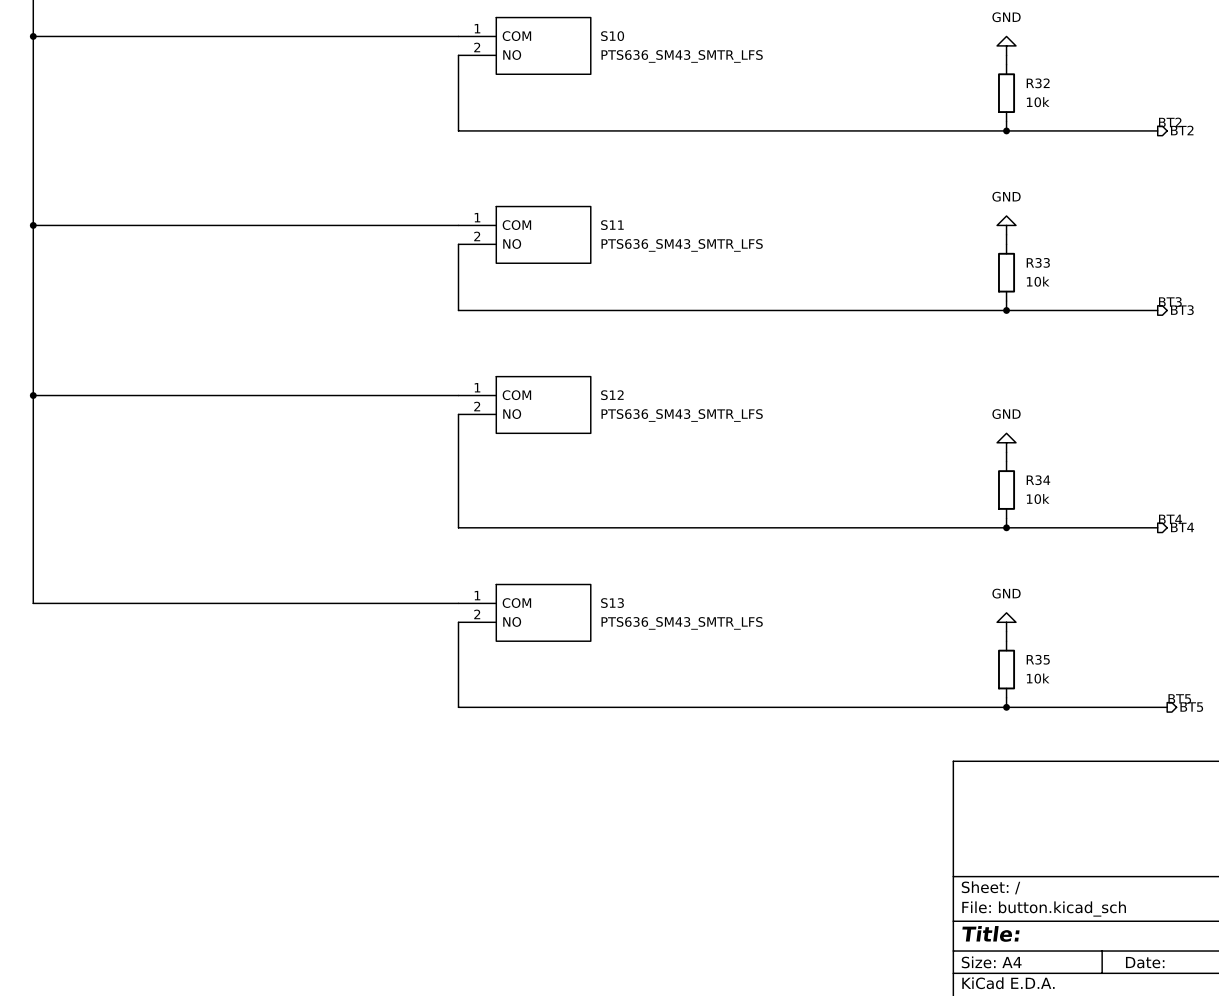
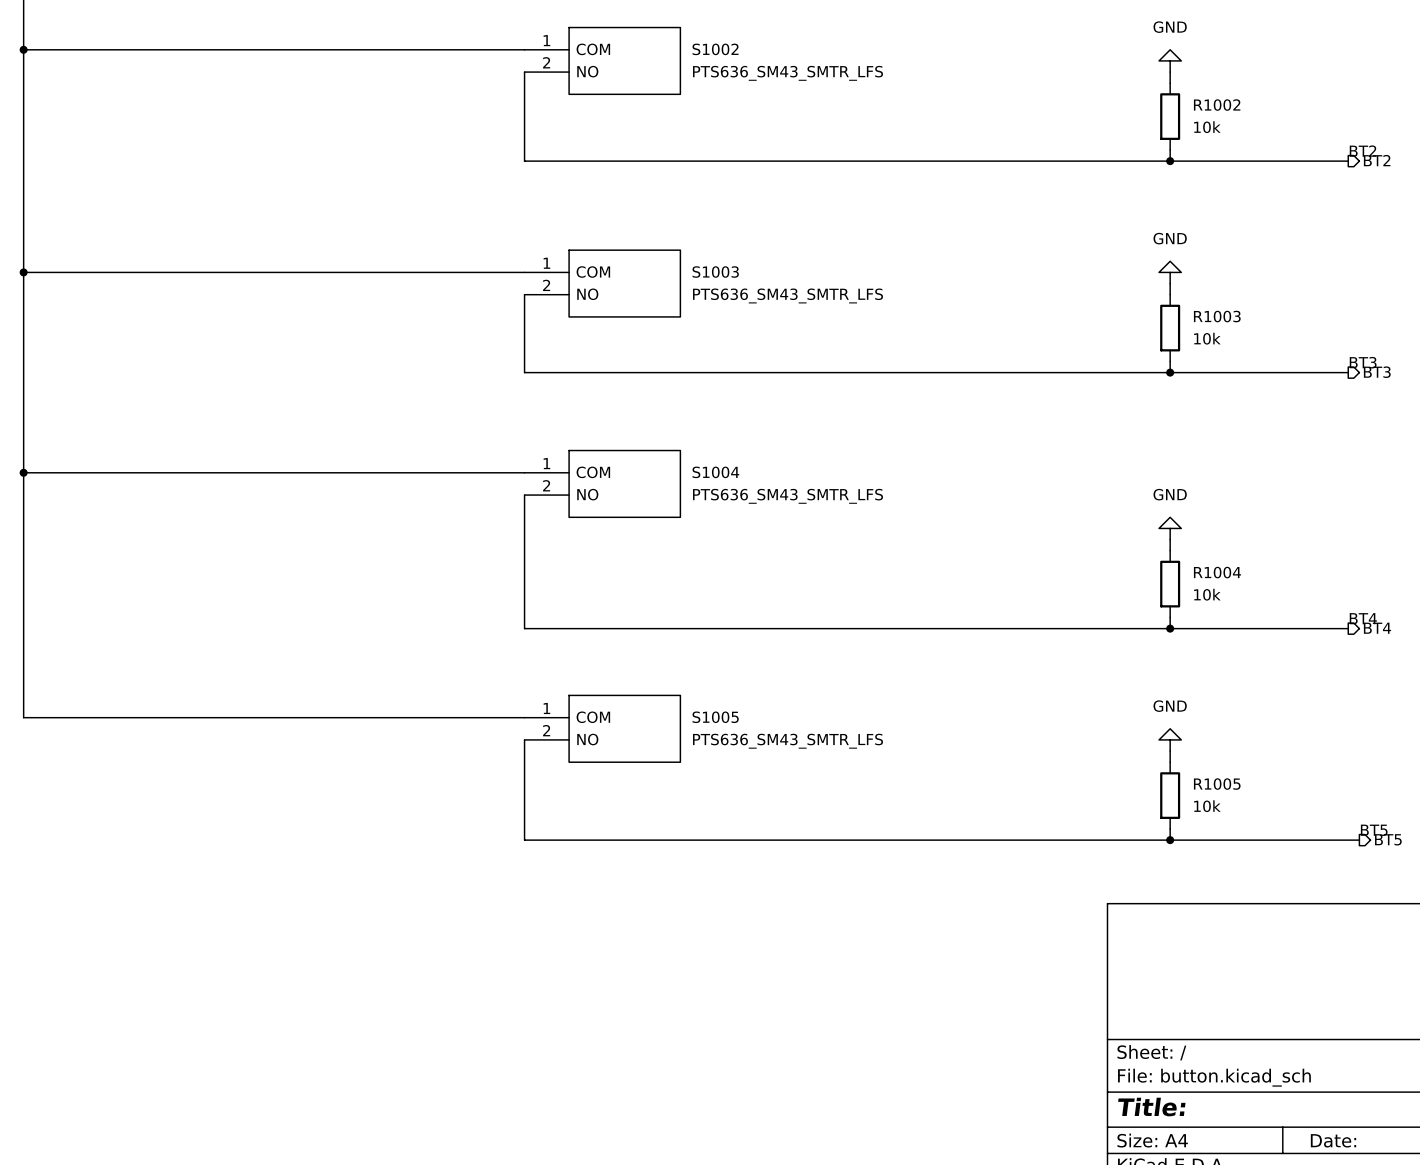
S10 name: S10 (612, 36) -> S1002 (715, 49)
R32 name: R32 (1038, 83) -> R1002 (1217, 105)
S11 name: S11 (612, 225) -> S1003 (715, 272)
R33 name: R33 (1038, 262) -> R1003 (1217, 316)
S12 name: S12 (612, 395) -> S1004 (715, 472)
R34 name: R34 (1038, 480) -> R1004 (1217, 572)
S13 name: S13 (612, 603) -> S1005 (715, 717)
R35 name: R35 (1038, 659) -> R1005 (1217, 784)

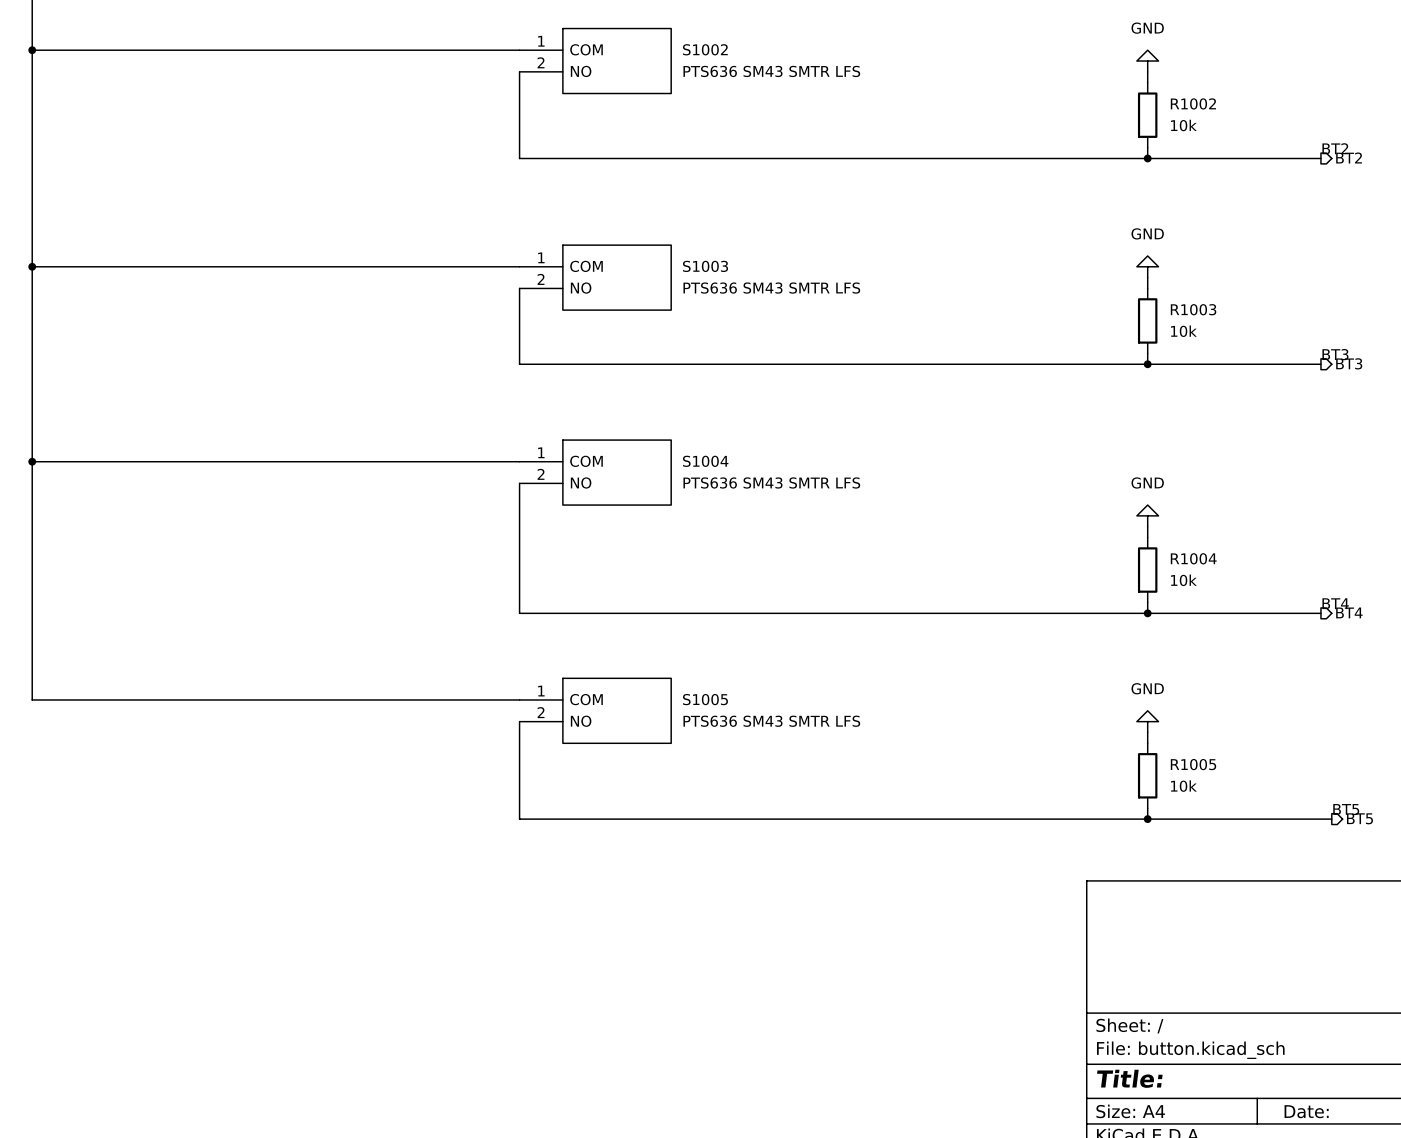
S1002 value: PTS636_SM43_SMTR_LFS (788, 73) -> PTS636 SM43 SMTR LFS (771, 71)
S1003 value: PTS636_SM43_SMTR_LFS (788, 295) -> PTS636 SM43 SMTR LFS (771, 288)
S1004 value: PTS636_SM43_SMTR_LFS (788, 496) -> PTS636 SM43 SMTR LFS (771, 482)
S1005 value: PTS636_SM43_SMTR_LFS (788, 741) -> PTS636 SM43 SMTR LFS (771, 721)

